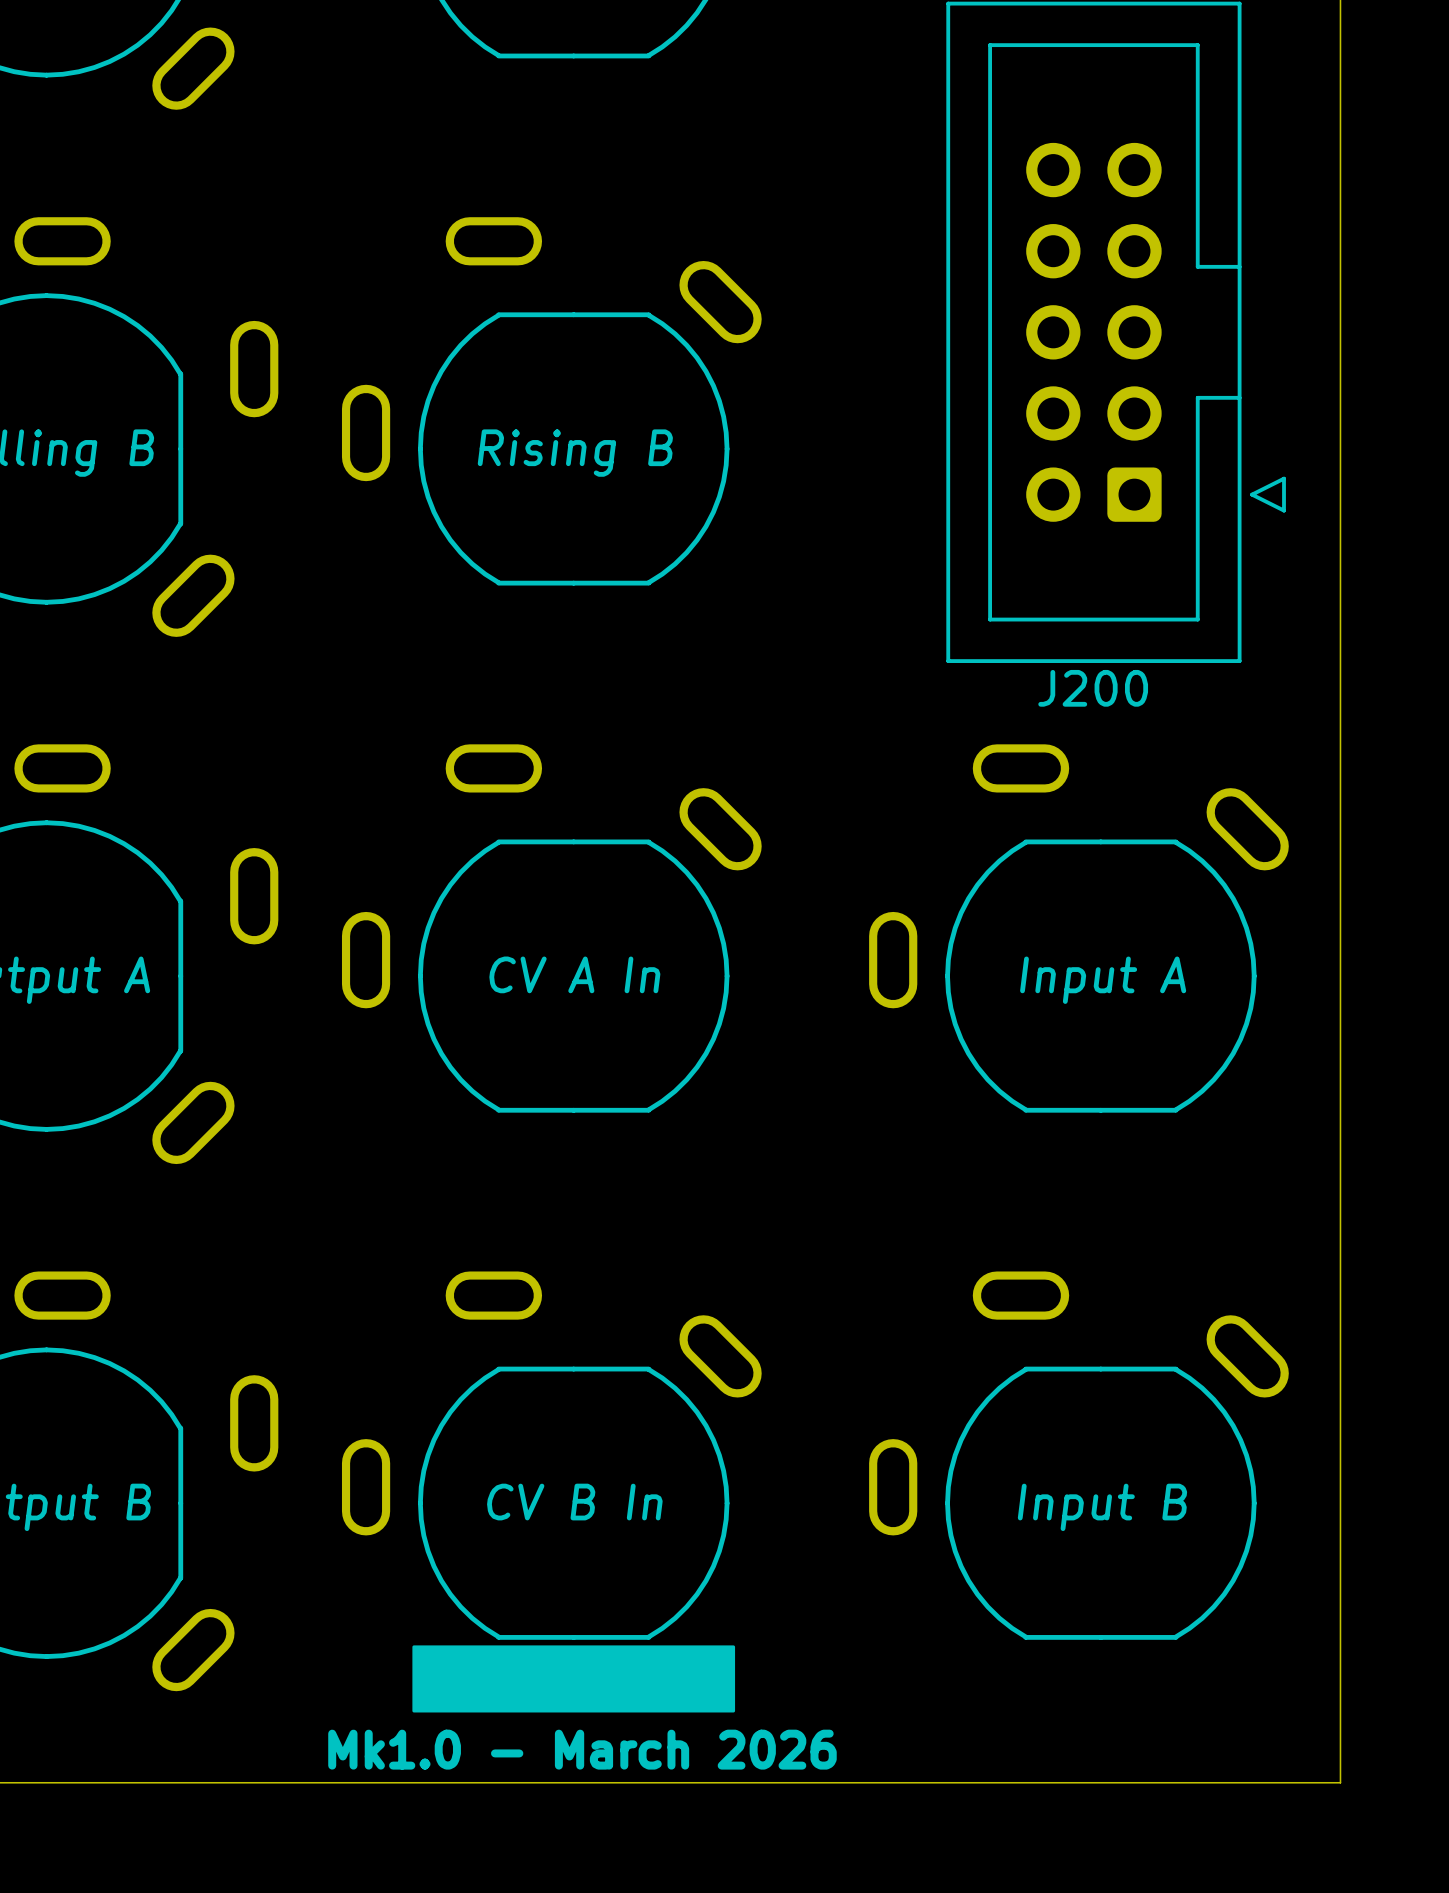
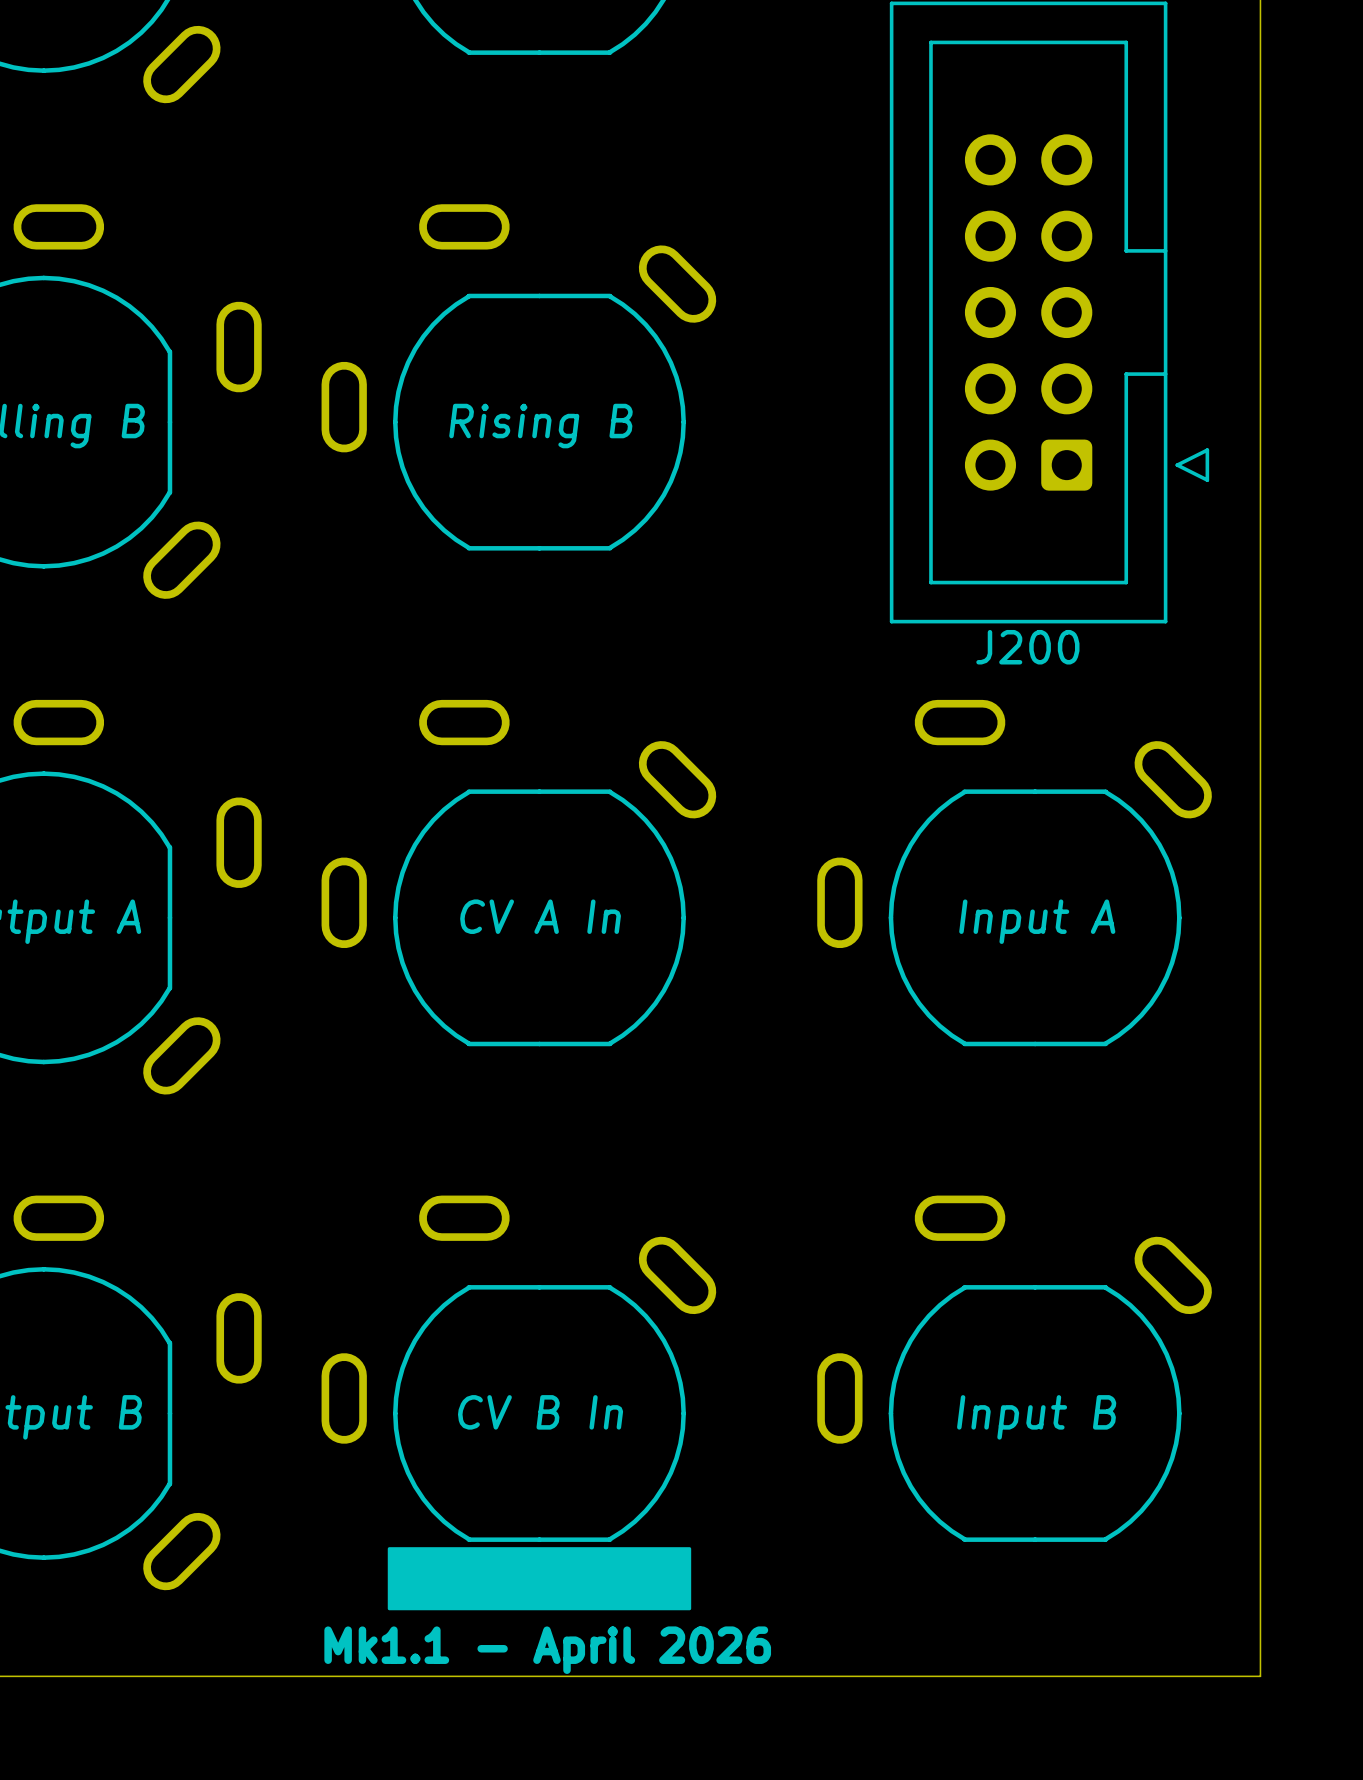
text: Mk1.0 - March 2026 (582, 1749) -> Mk1.1 - April 2026 (547, 1650)

